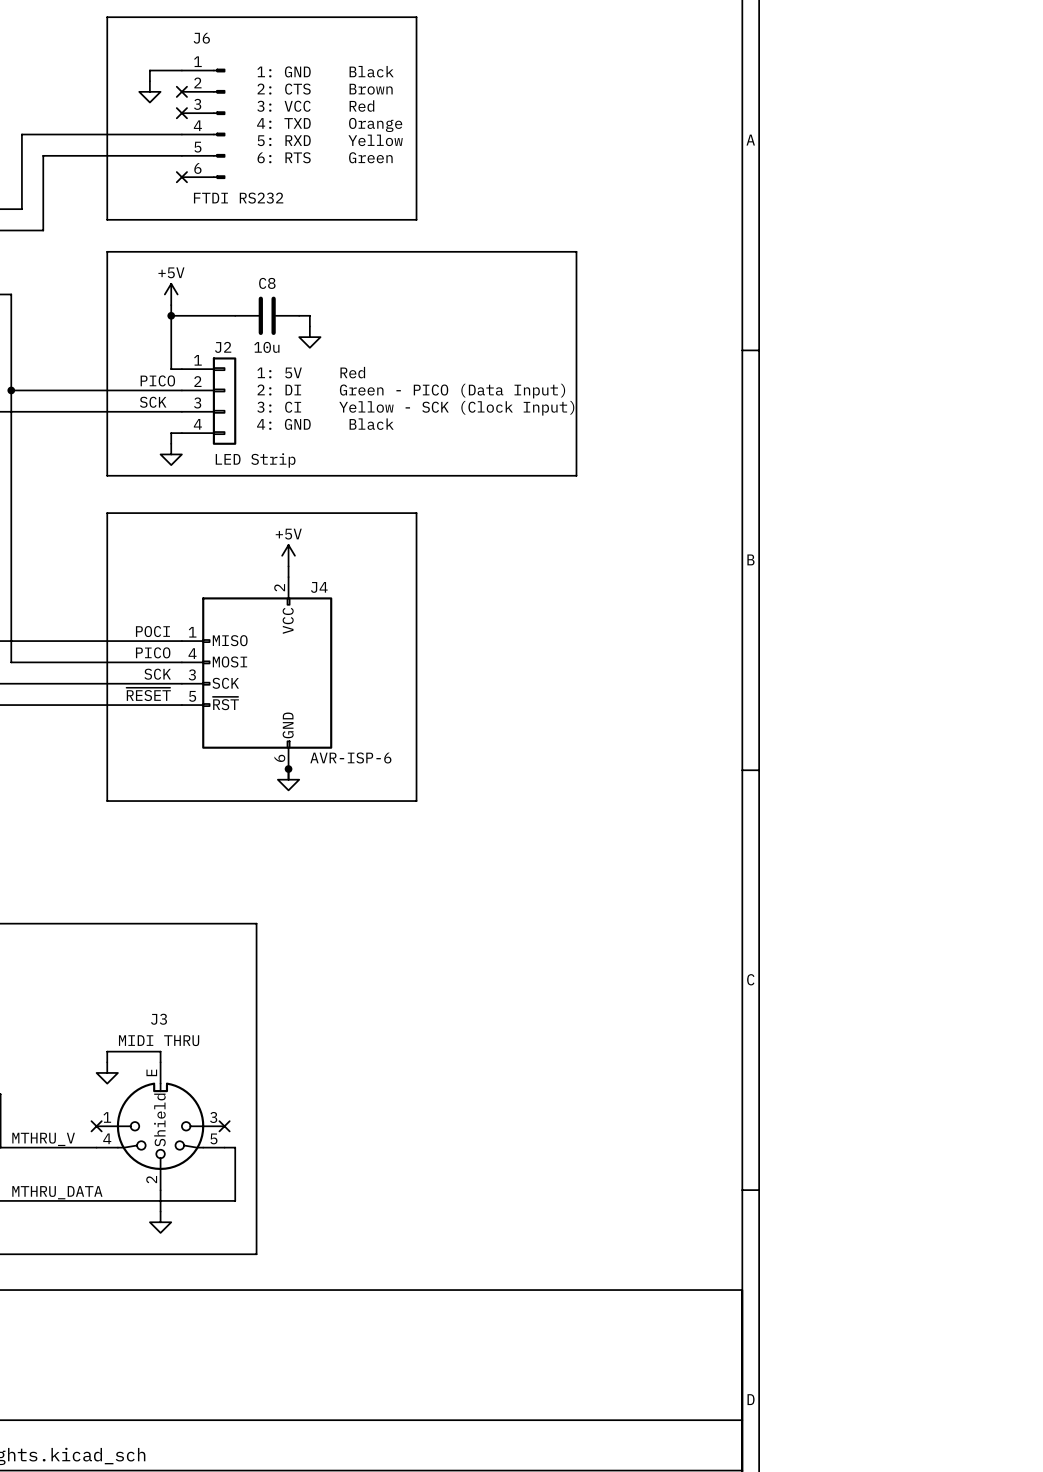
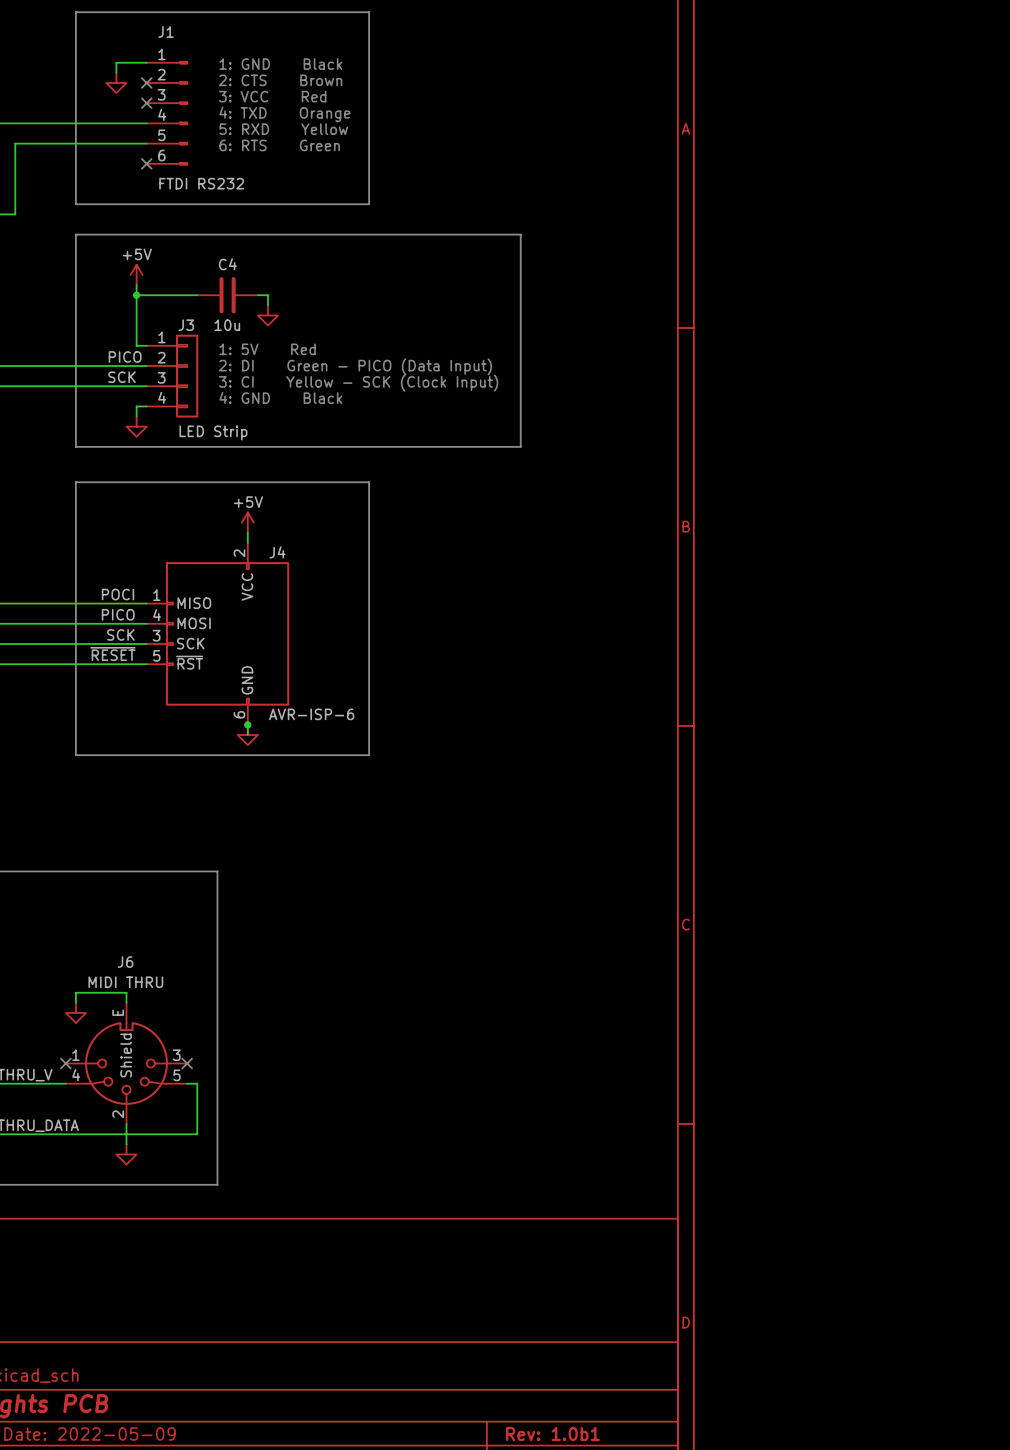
J6 name: J6 (201, 38) -> J1 (166, 32)
C8 name: C8 (267, 283) -> C4 (227, 264)
J2 name: J2 (223, 347) -> J3 (186, 325)
J3 name: J3 (159, 1019) -> J6 (125, 962)

